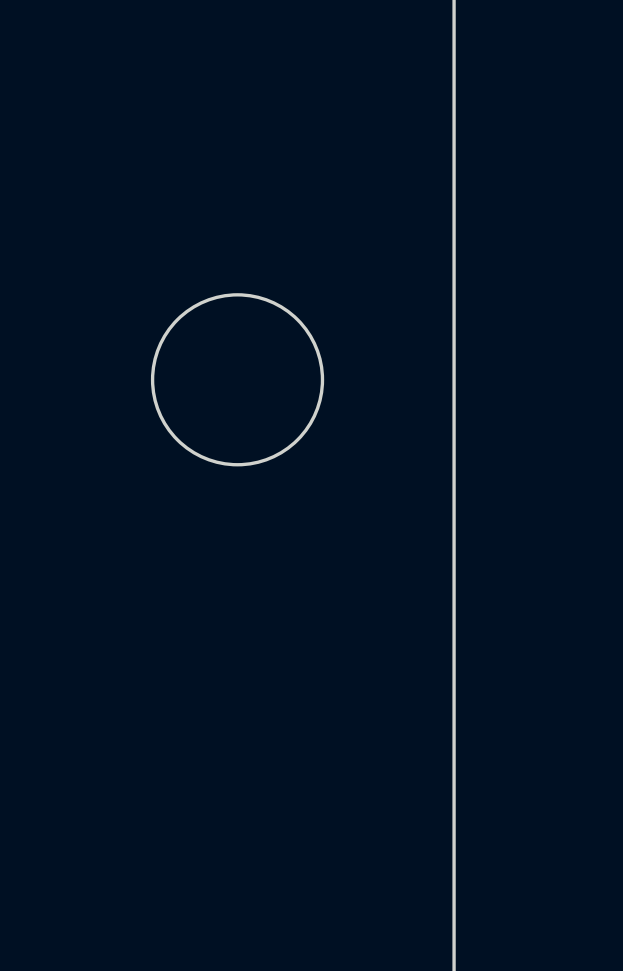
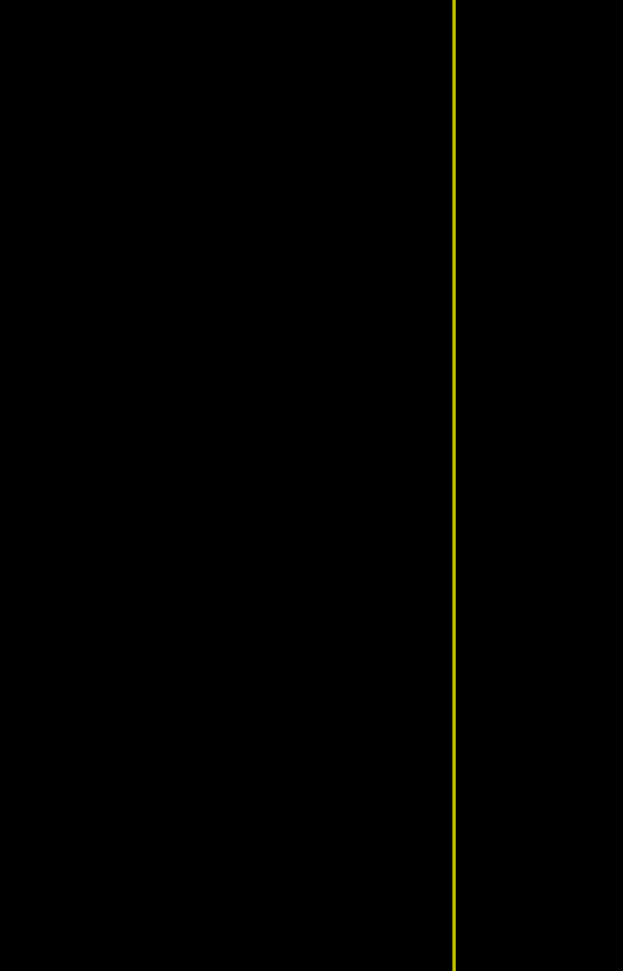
round board edge: [150, 293, 325, 467] -> none

